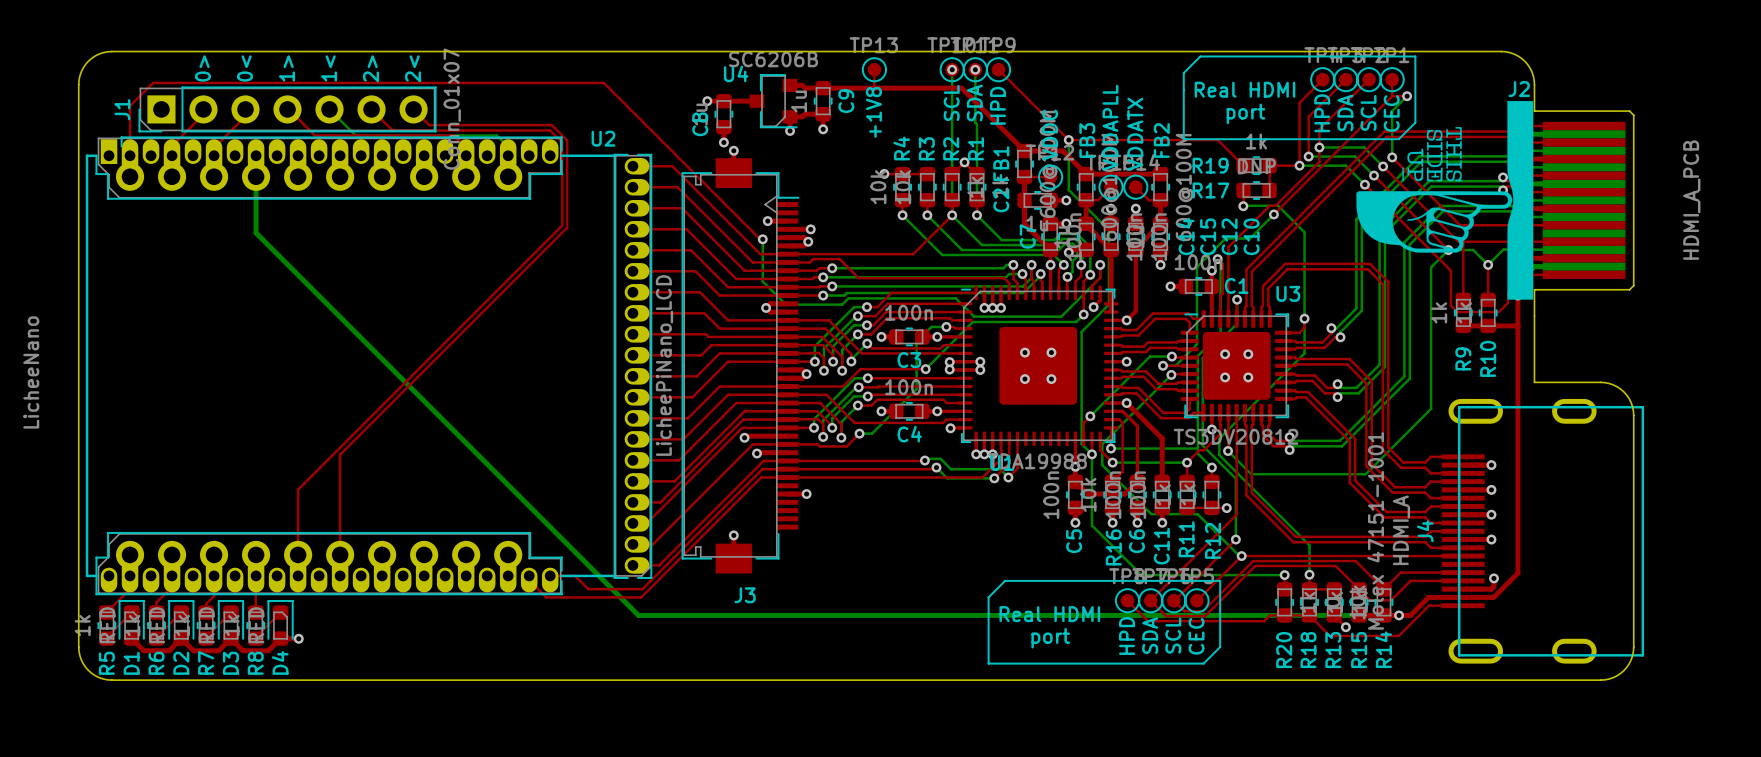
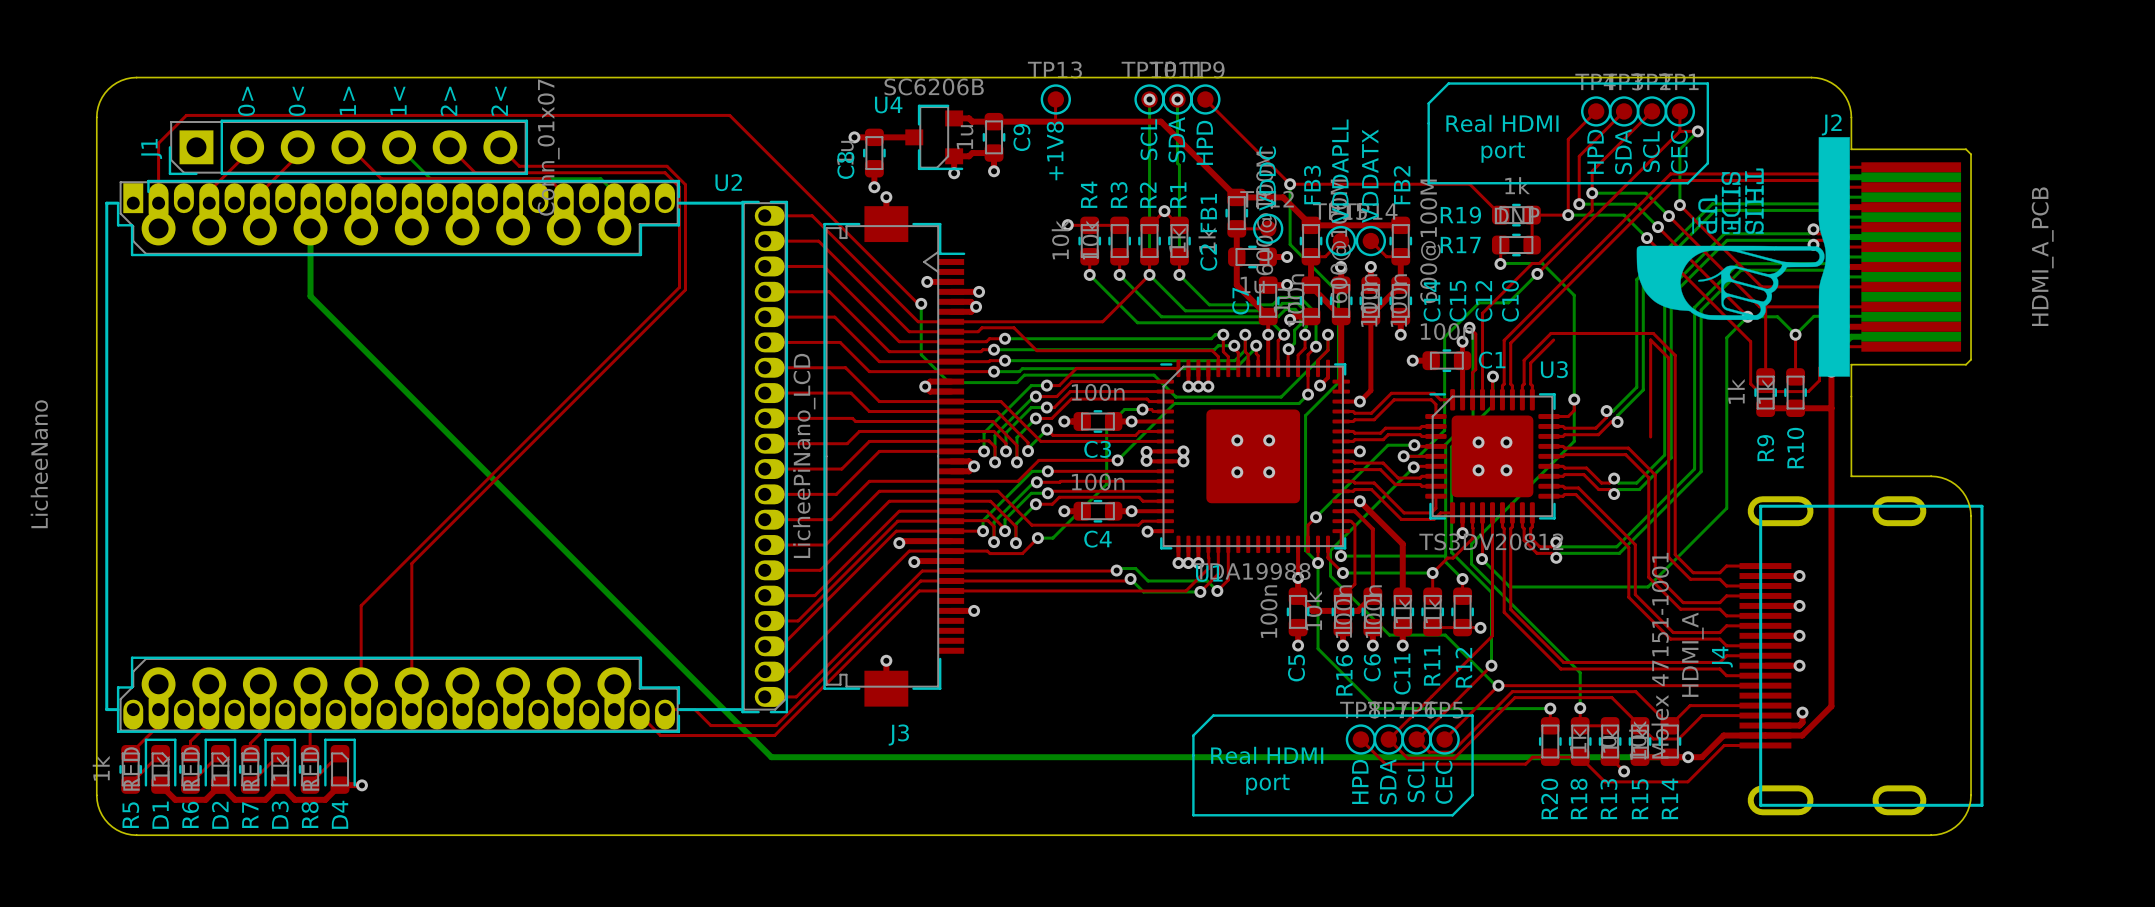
top track: (1287, 269) (1367, 269) -> (1650, 437) (1650, 340)

